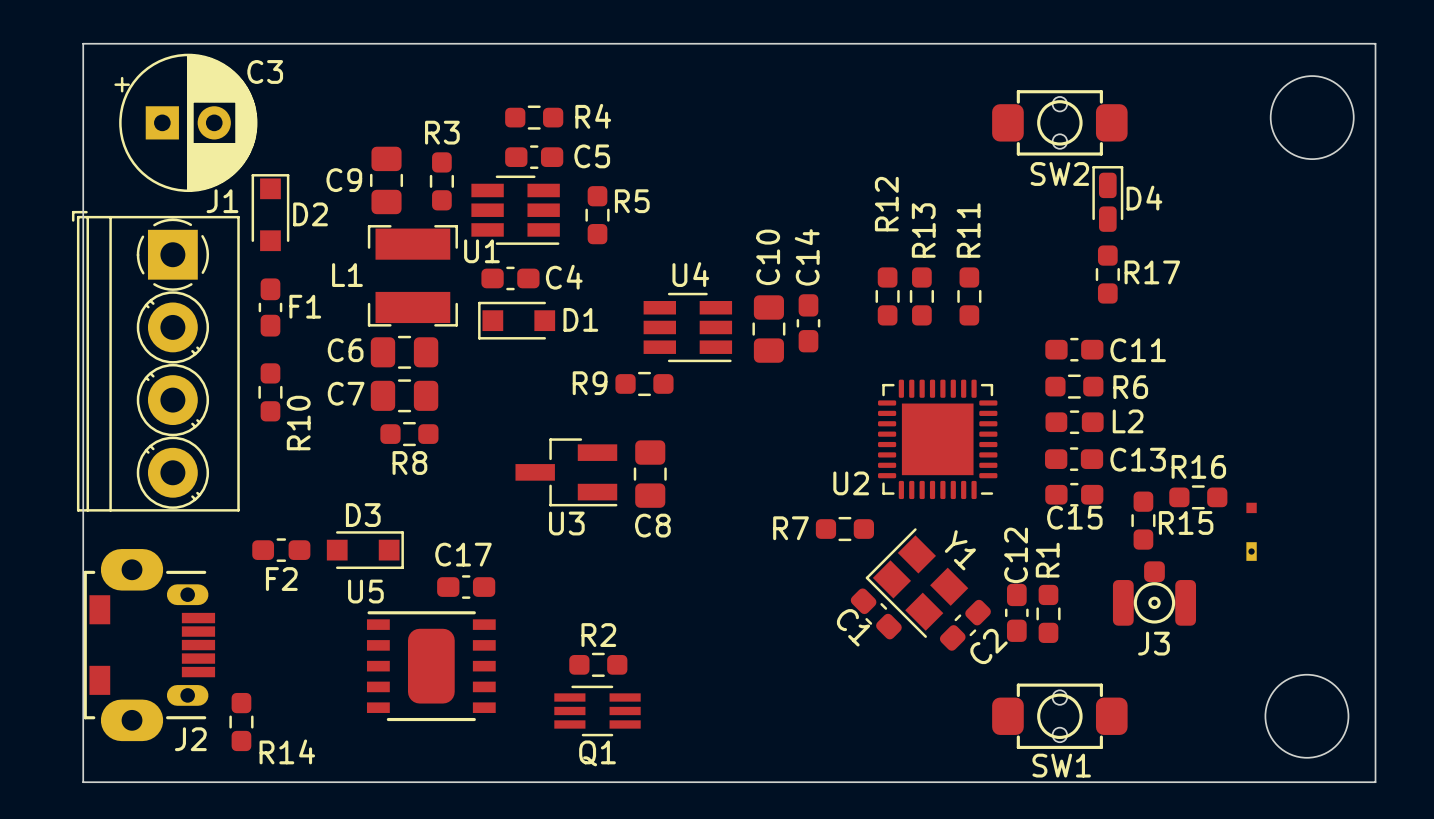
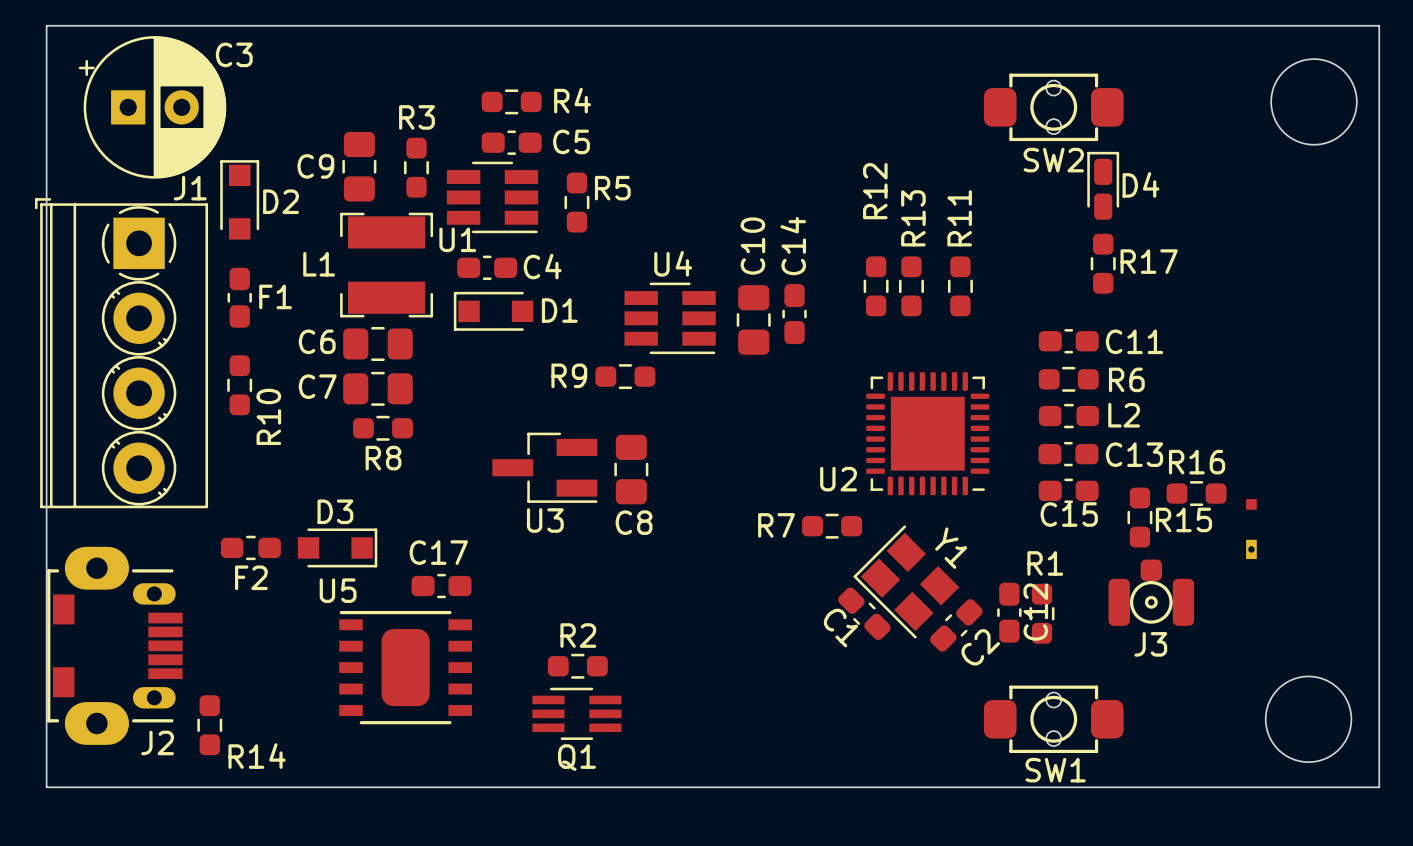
C12 name position: C12 (1016, 555) -> C12 (1035, 612)
R1 name rotation: 0° (1047, 560) -> 90° clockwise (1045, 563)

